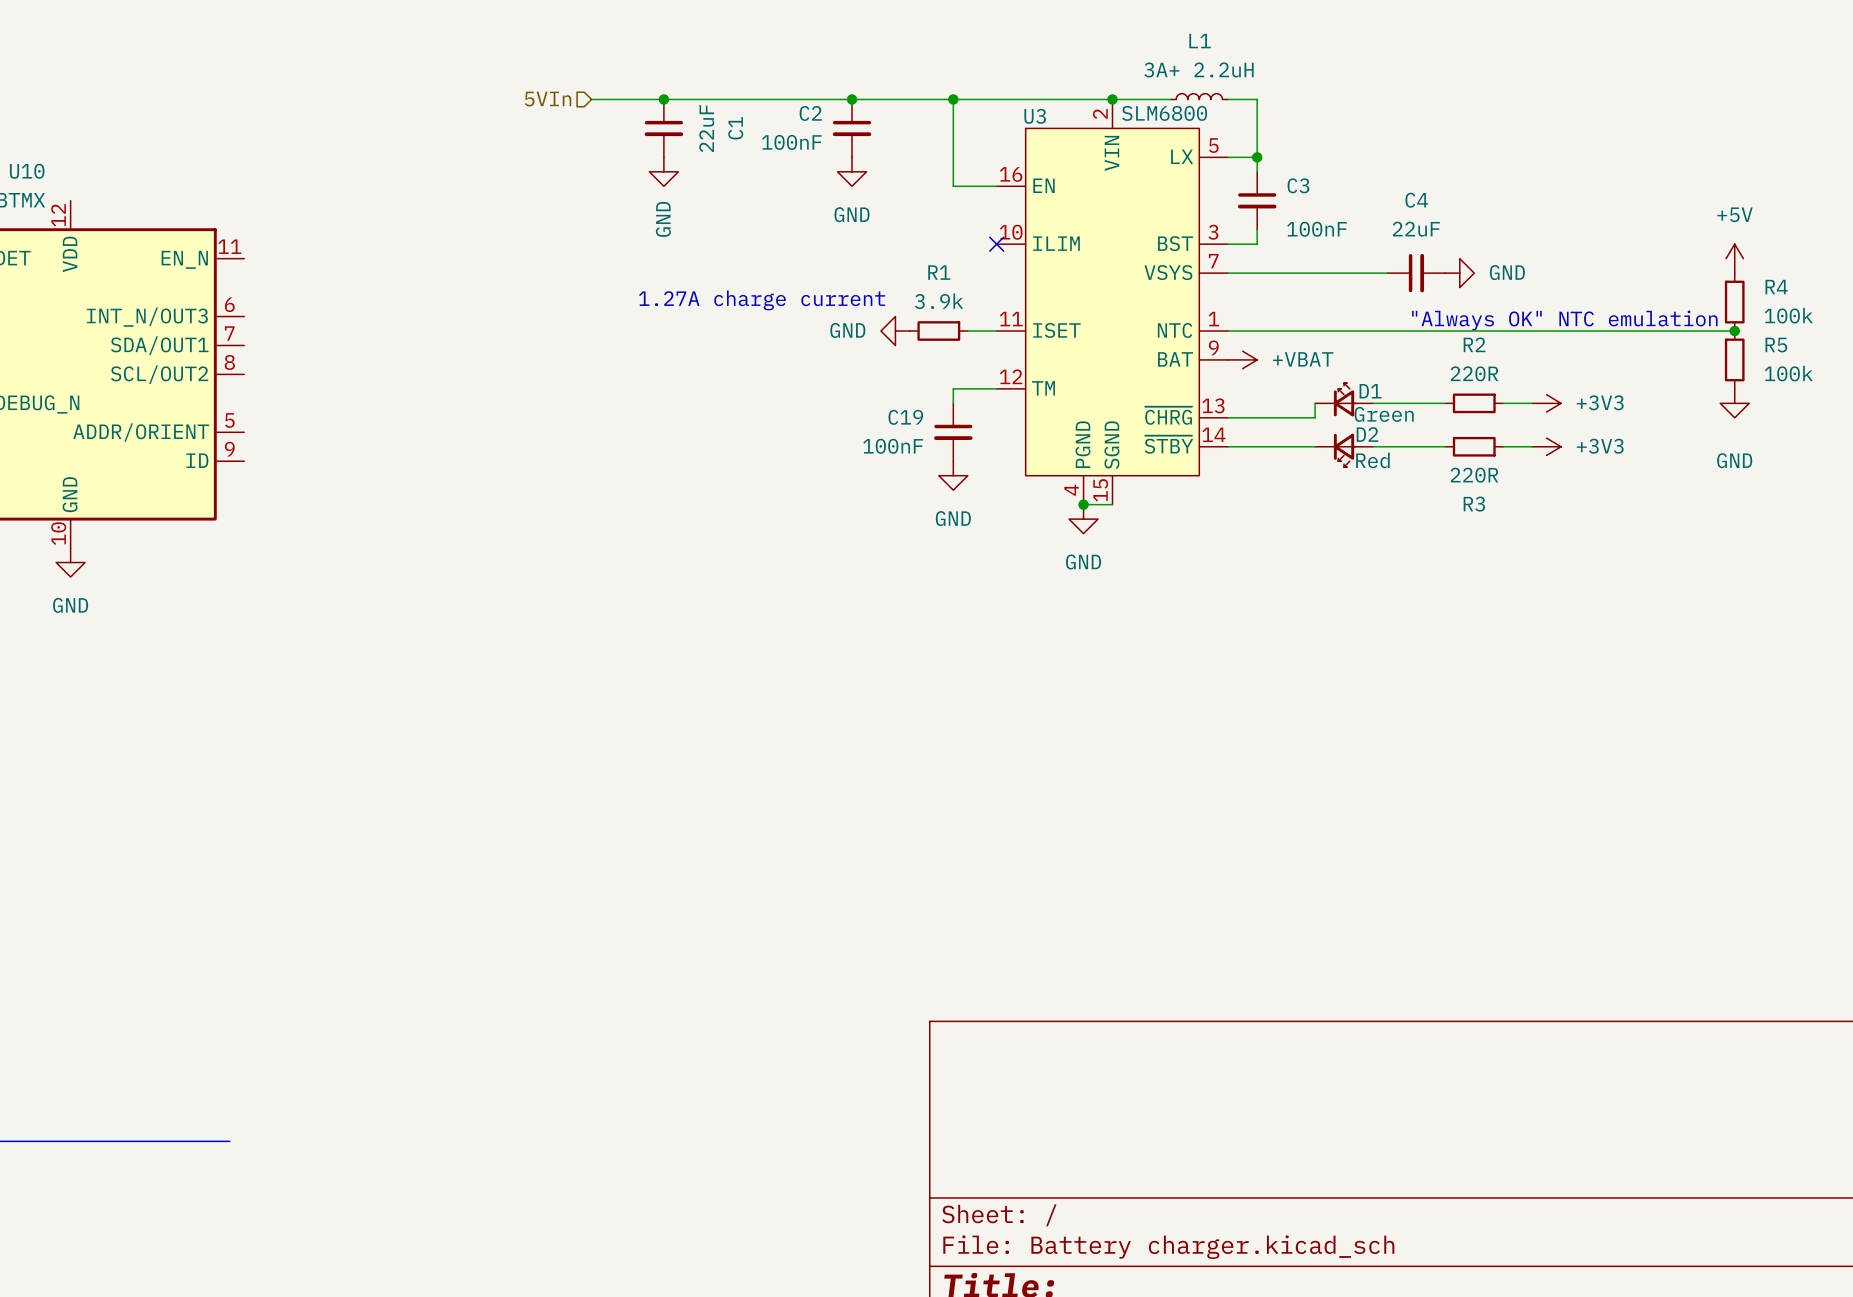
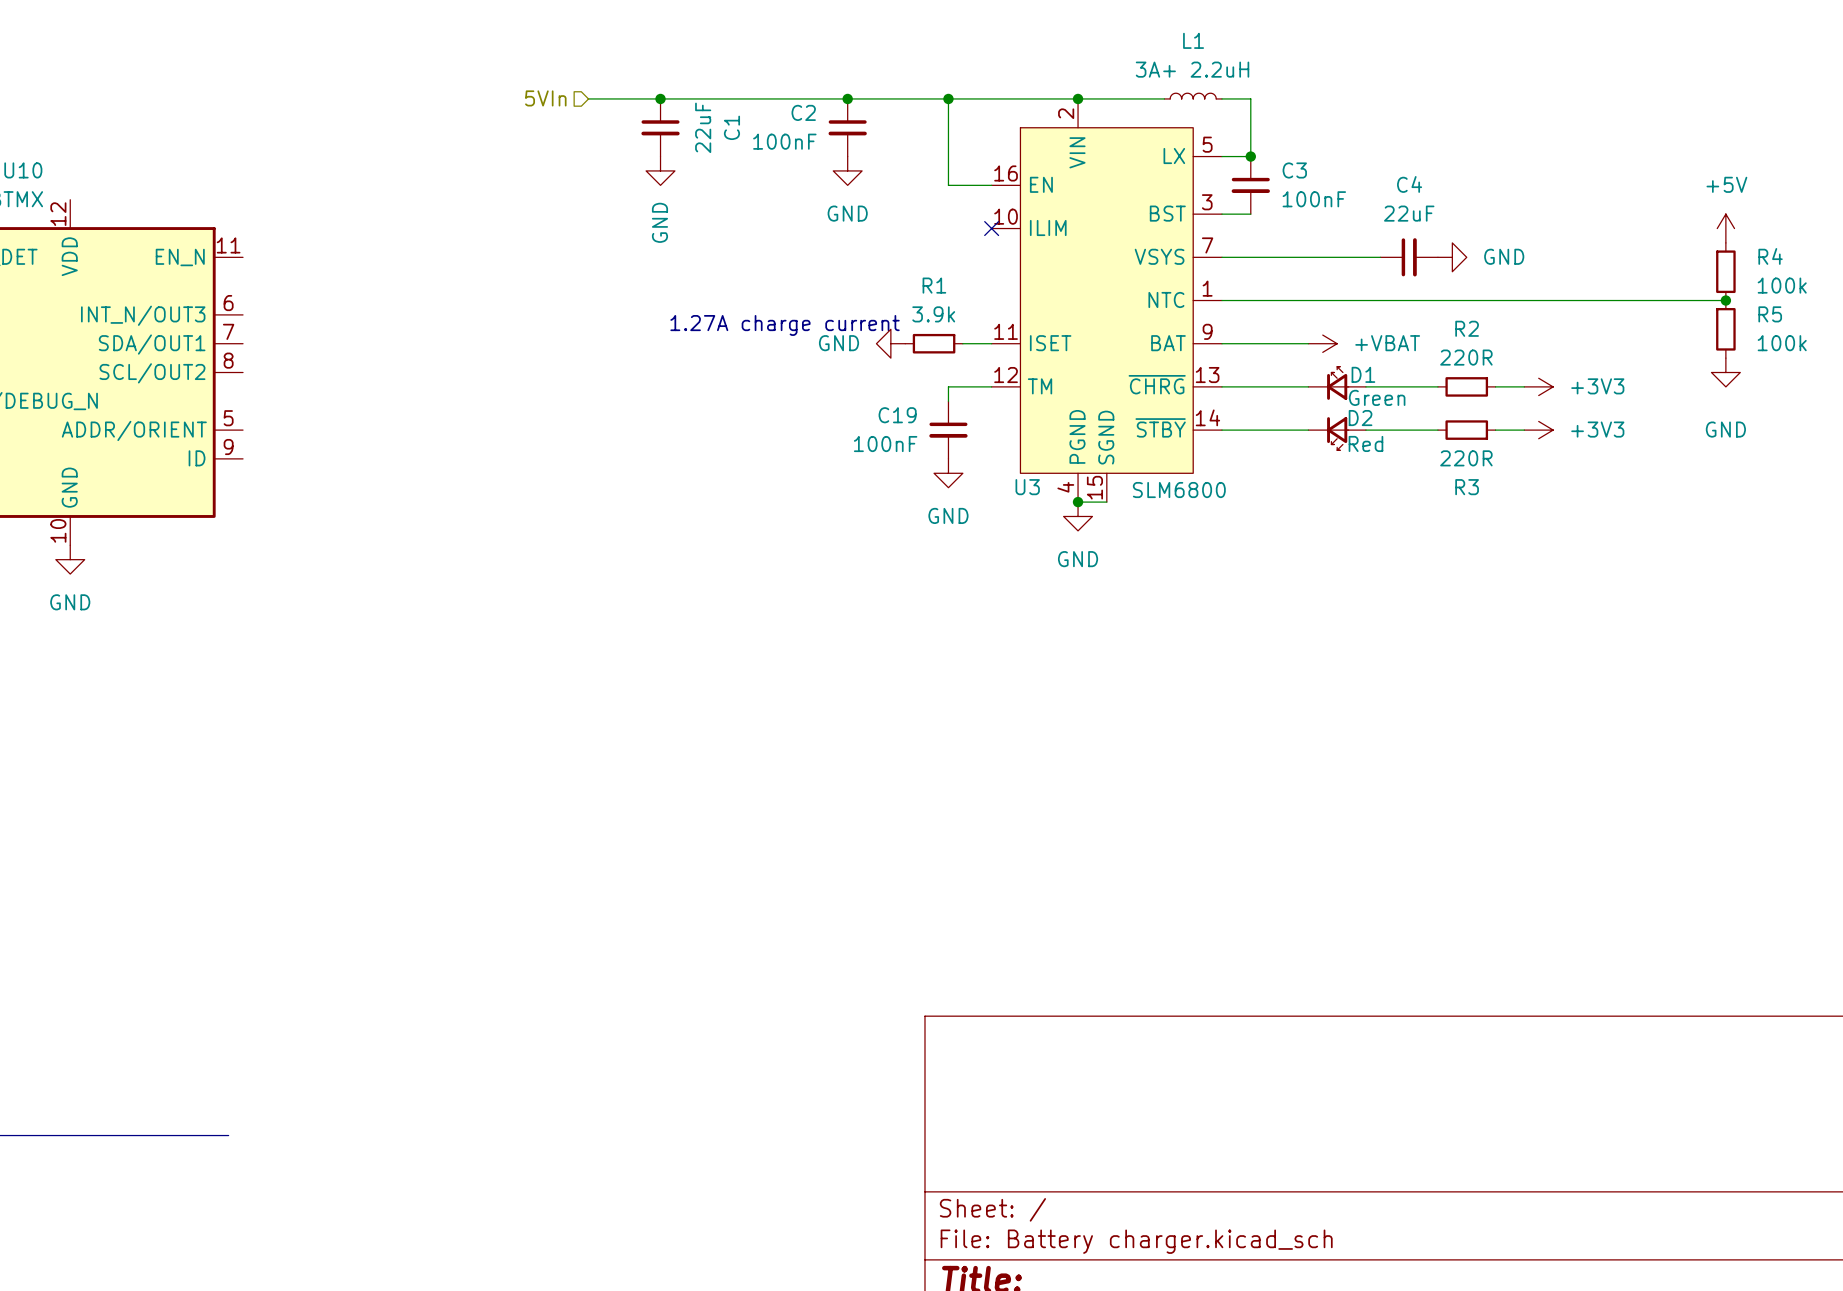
U3 symbol: [996, 99, 1229, 505] -> [991, 98, 1223, 503]
junction position: (1112, 99) -> (1078, 98)
U3 value position: SLM6800 (1164, 113) -> SLM6800 (1179, 490)
U3 name position: U3 (1035, 116) -> U3 (1027, 487)
C3 position: (1257, 200) -> (1250, 185)
wire: none -> (1222, 214) (1250, 214)
wire: (1257, 229) (1257, 244) (1228, 244) -> none
C3 value position: 100nF (1317, 229) -> 100nF (1314, 199)
no-connect mark position: (996, 244) -> (991, 228)
power symbol position: +5V (1734, 258) -> +5V (1725, 228)
wire: (1228, 273) (1387, 273) -> (1222, 257) (1380, 257)
C4 position: (1416, 273) -> (1409, 257)
power symbol position: GND (1459, 273) -> GND (1452, 257)
text position: 1.27A charge current (762, 300) -> 1.27A charge current (785, 325)
R4 position: (1734, 302) -> (1725, 271)
text: "Always OK" NTC emulation (1564, 320) -> none
power symbol position: GND (895, 331) -> GND (890, 343)
R1 position: (938, 331) -> (934, 343)
wire: (967, 331) (996, 331) -> (962, 343) (991, 343)
wire: (1228, 331) (1734, 331) -> (1222, 300) (1725, 300)
junction position: (1734, 331) -> (1725, 300)
wire: none -> (1222, 343) (1308, 343)
power symbol position: +VBAT (1242, 359) -> +VBAT (1322, 343)
R5 position: (1734, 359) -> (1725, 329)
wire: none -> (1222, 386) (1308, 386)
power symbol: none -> +3V3 (1538, 386)
D1 position: (1344, 399) -> (1337, 383)
wire: (1315, 403) (1315, 417) (1228, 417) -> none
wire: (1372, 403) (1445, 403) -> (1365, 386) (1437, 386)
R2 position: (1474, 403) -> (1466, 386)
wire: (1503, 403) (1532, 403) -> (1495, 386) (1524, 386)
power symbol: +3V3 (1546, 403) -> none
power symbol position: GND (1734, 403) -> GND (1725, 372)
power symbol: none -> +3V3 (1538, 430)
wire: (1228, 446) (1315, 446) -> (1222, 430) (1308, 430)
wire: (1372, 446) (1445, 446) -> (1365, 430) (1437, 430)
R3 position: (1474, 446) -> (1466, 430)
wire: (1503, 446) (1532, 446) -> (1495, 430) (1524, 430)
power symbol: +3V3 (1546, 446) -> none
D2 position: (1344, 450) -> (1337, 433)

